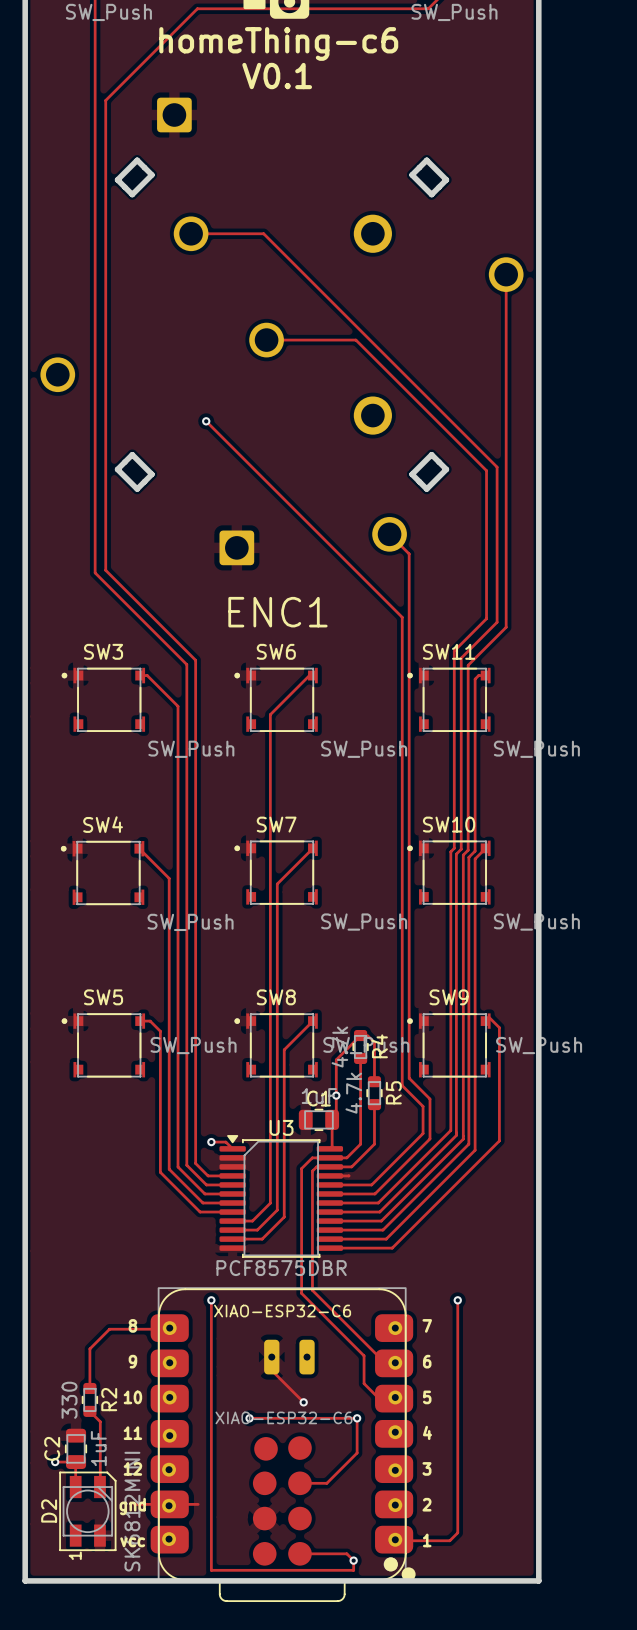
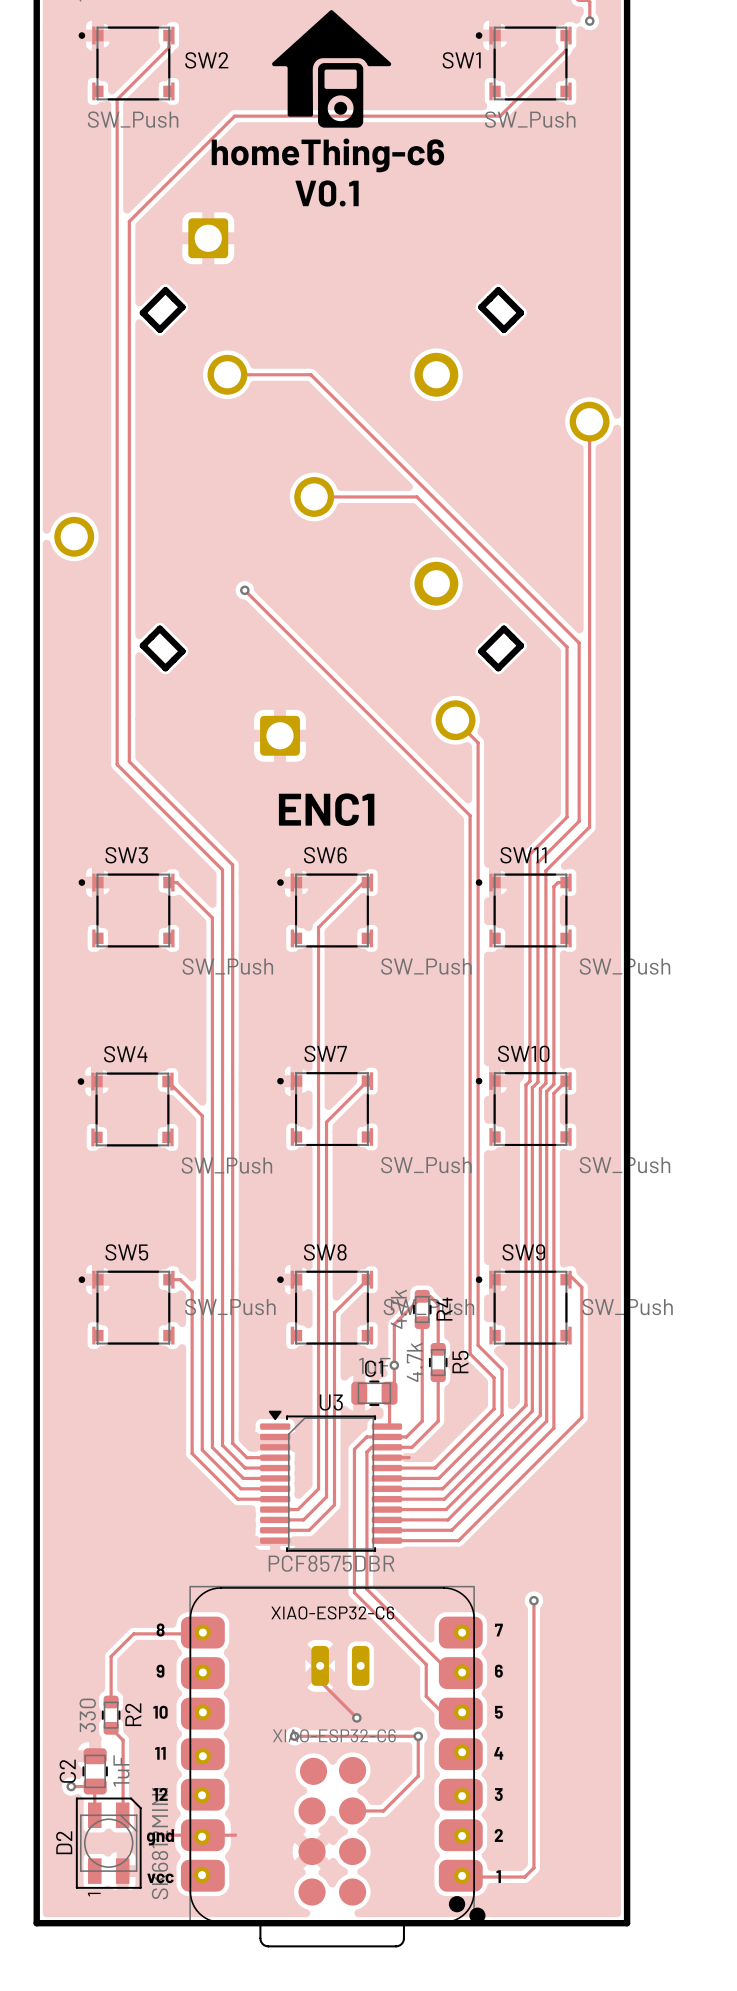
track: (211, 1142) (225, 1142) (232, 1148) -> none
via: (211, 1142) -> none
track: (211, 1300) (211, 1570) (353, 1570) (353, 1560) (346, 1553) (299, 1553) -> none
via: (211, 1300) -> none
via: (353, 1560) -> none

